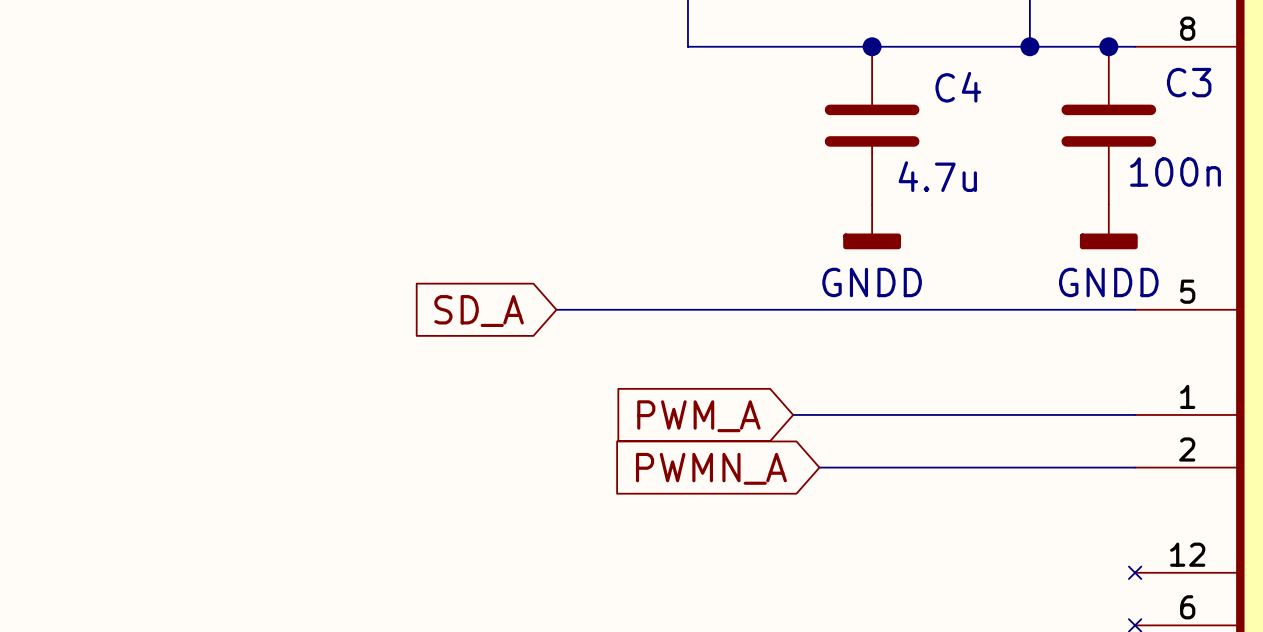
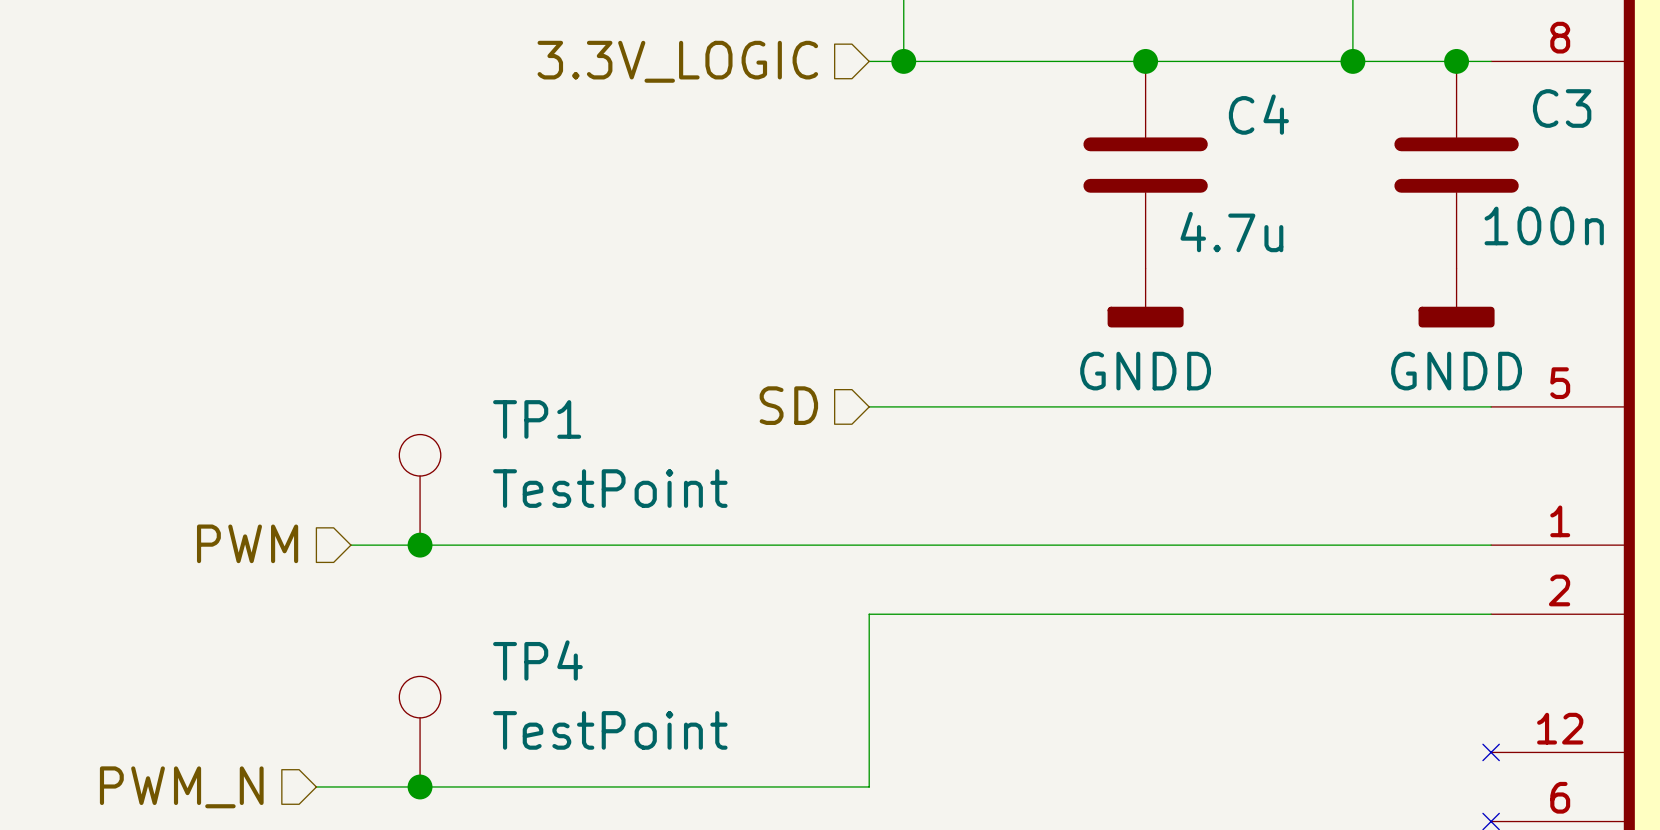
wire: none -> (869, 61) (903, 61)
junction: none -> (903, 61)
hierarchical label: none -> 3.3V_LOGIC (677, 61)
hierarchical label: none -> SD (788, 405)
wire: (556, 309) (661, 309) -> none
global label: SD_A (479, 311) -> none
TP1: none -> TestPoint (420, 489)
hierarchical label: none -> PWM (247, 543)
wire: none -> (350, 545) (1041, 545)
junction: none -> (420, 545)
global label: PWM_A (698, 416) -> none
wire: none -> (1076, 614) (869, 614) (869, 786) (316, 786)
global label: PWMN_A (711, 468) -> none
TP4: none -> TestPoint (420, 731)
hierarchical label: none -> PWM_N (181, 787)
junction: none -> (420, 786)

